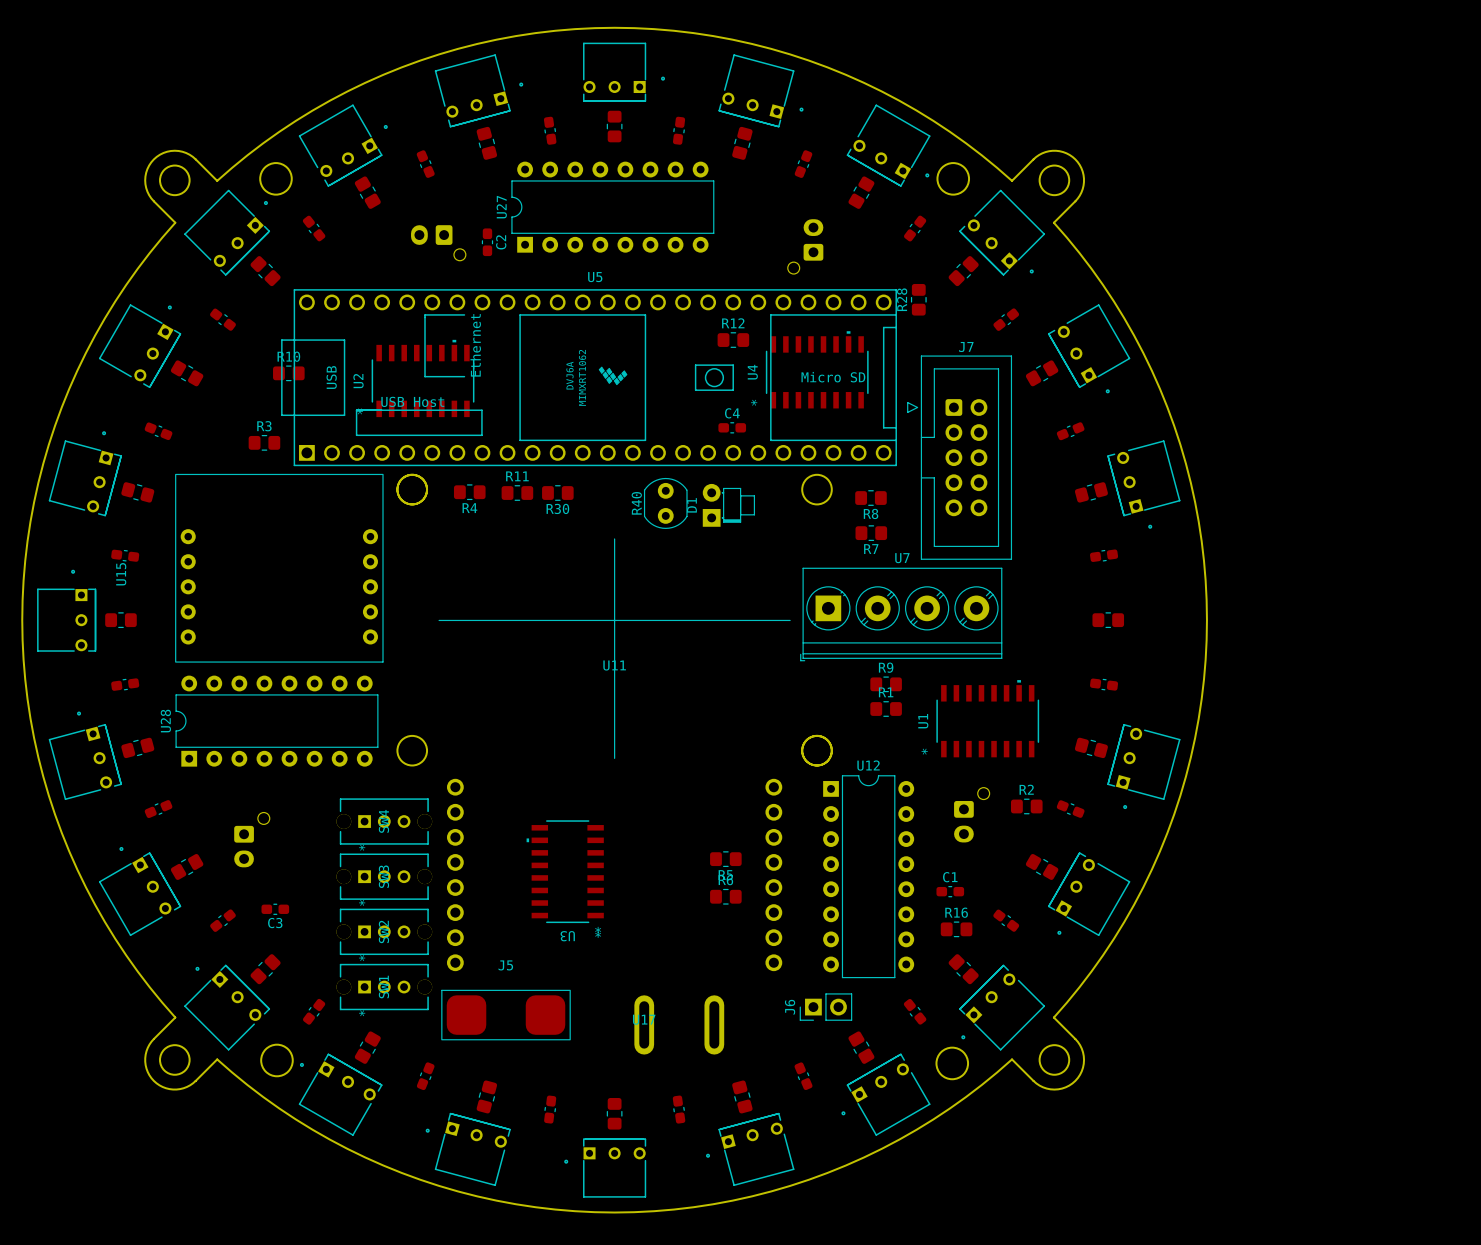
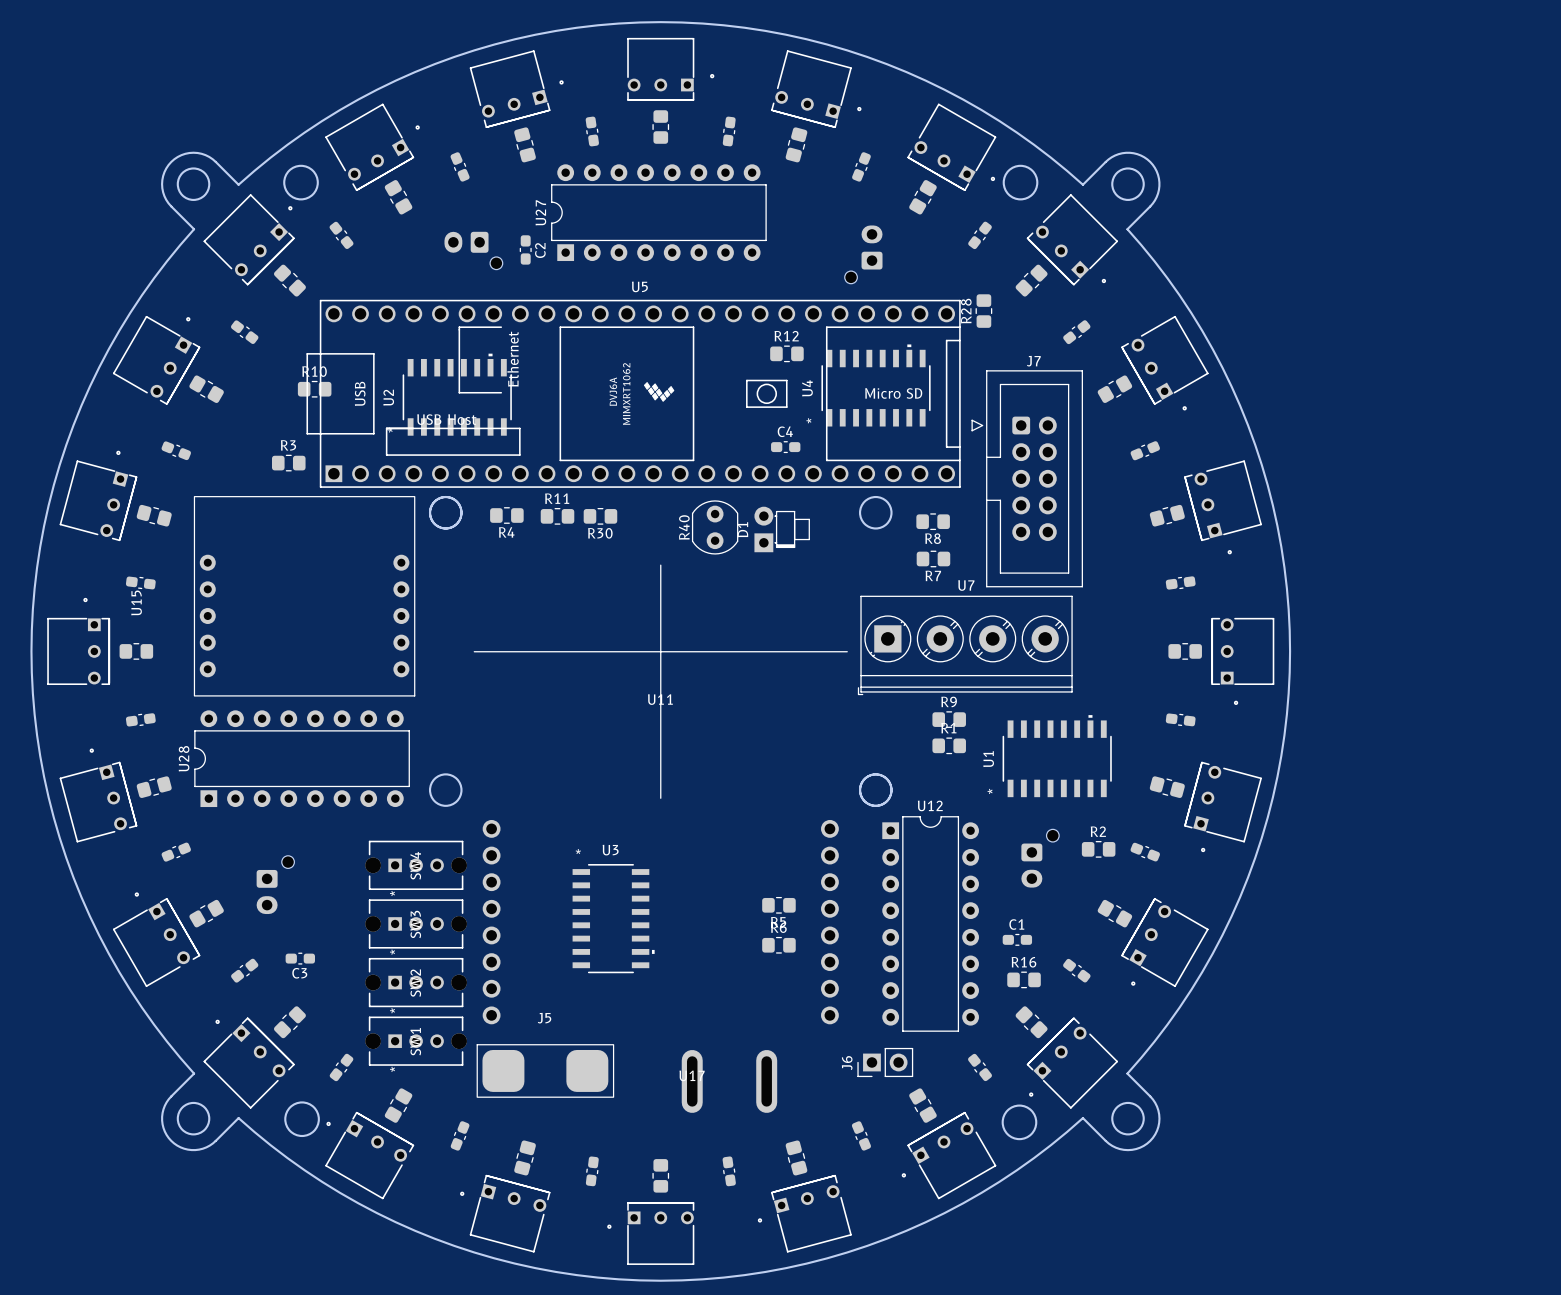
part: none -> (1242, 661)
U3 rotation: 0° (565, 871) -> 180° (613, 918)

